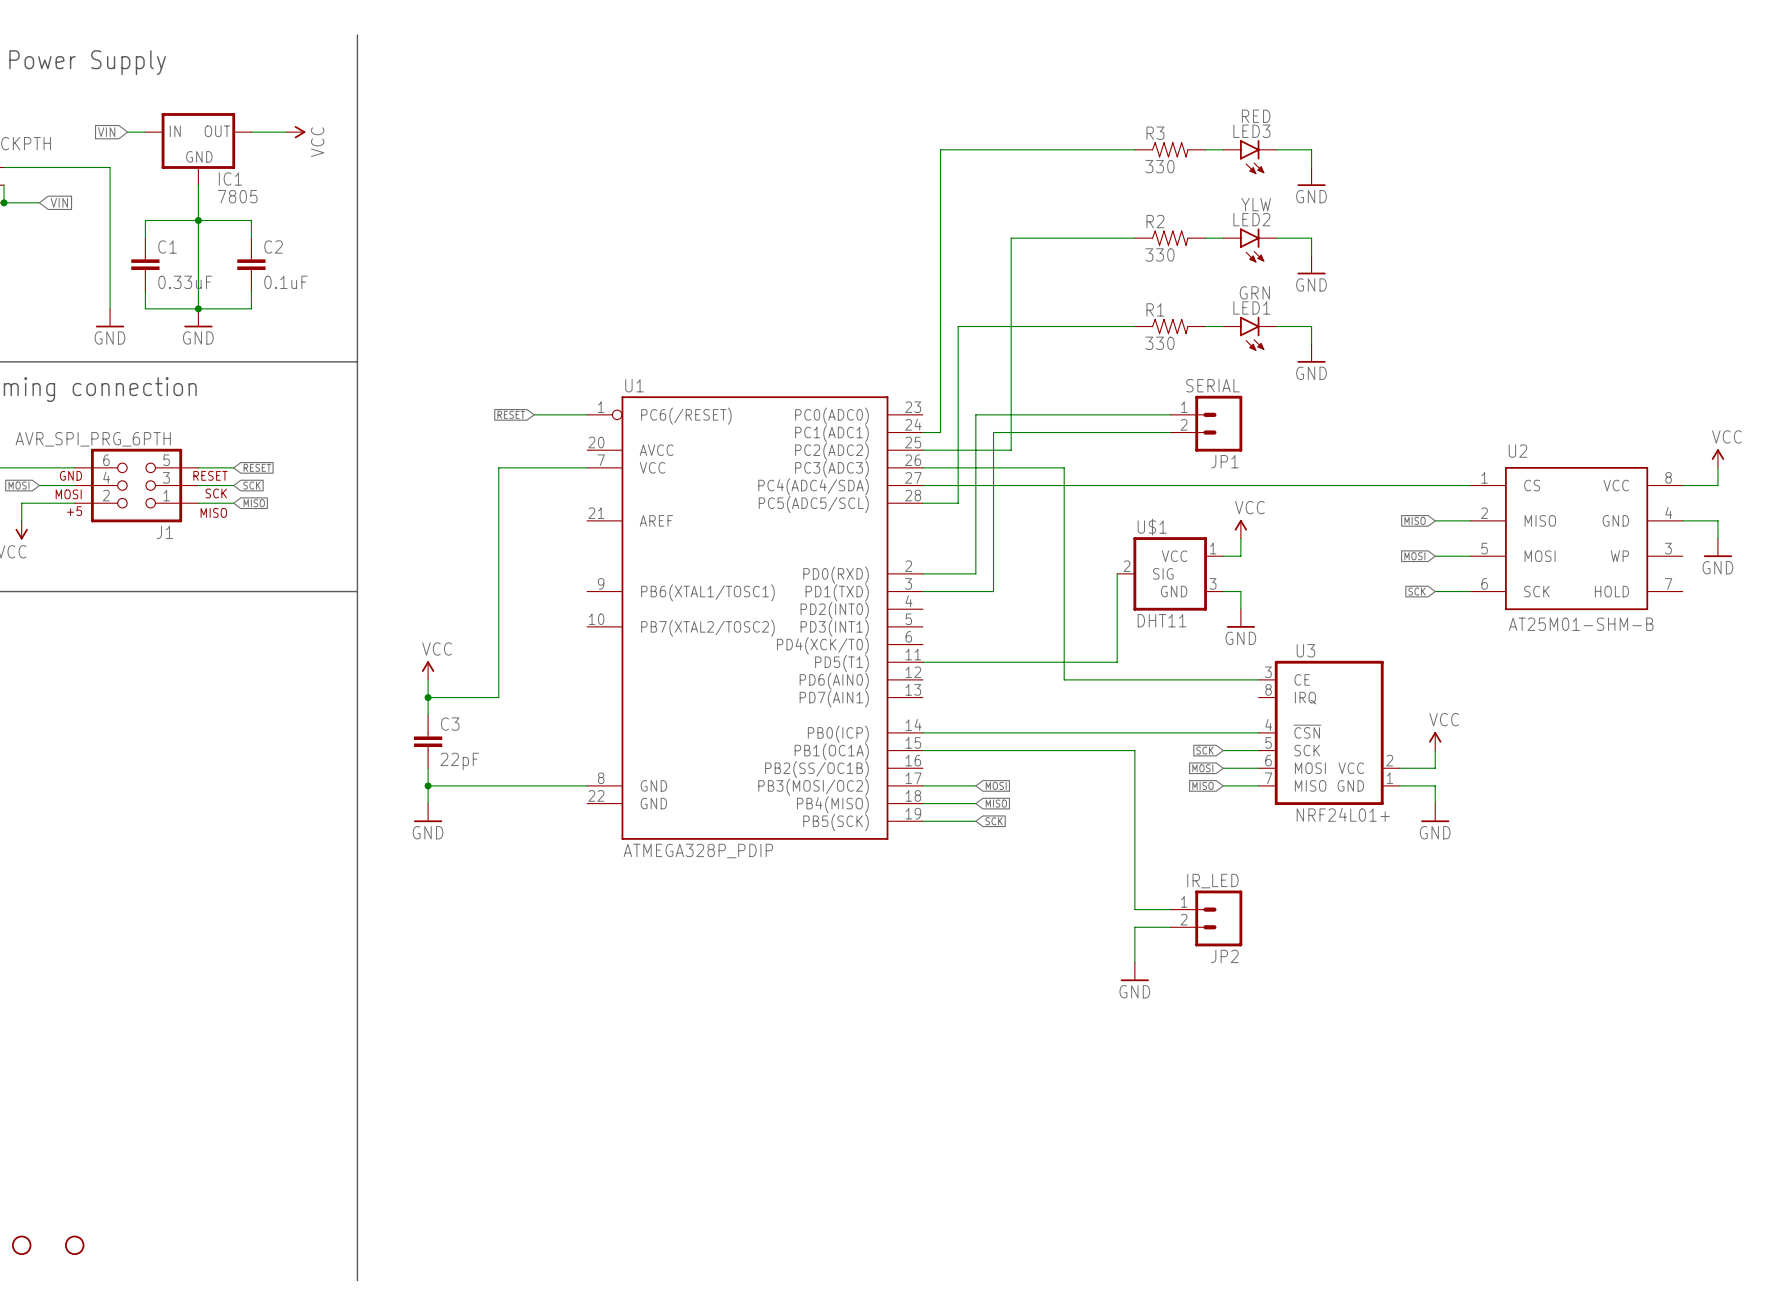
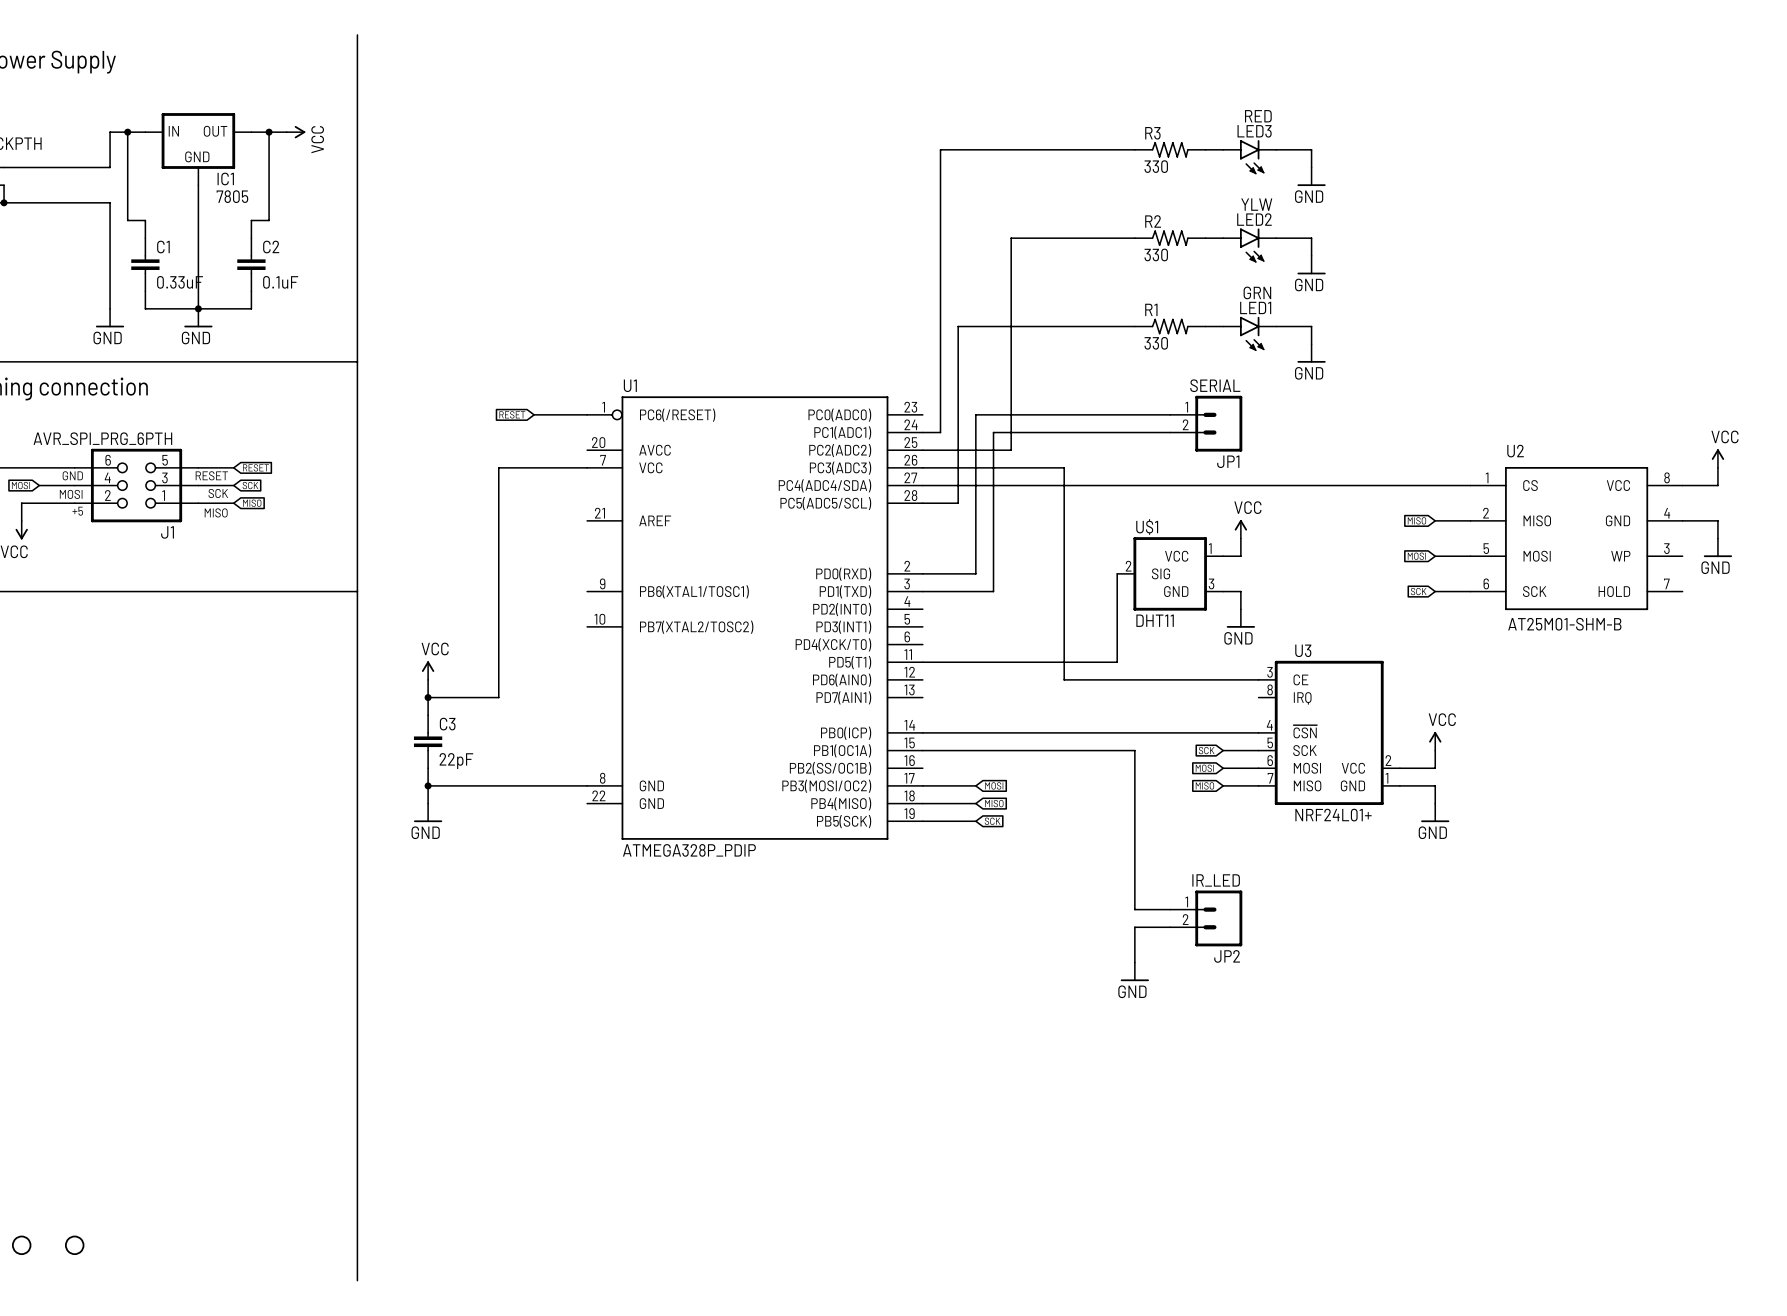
global label: VIN (106, 132) -> none
junction: none -> (127, 132)
junction: none -> (269, 132)
wire: (110, 167) (110, 202) -> (110, 167) (110, 132) (127, 132) (127, 220) (145, 220)
wire: none -> (39, 202) (110, 202)
global label: VIN (59, 202) -> none
wire: (145, 220) (251, 220) -> (269, 132) (269, 220) (251, 220)
junction: (198, 220) -> none

